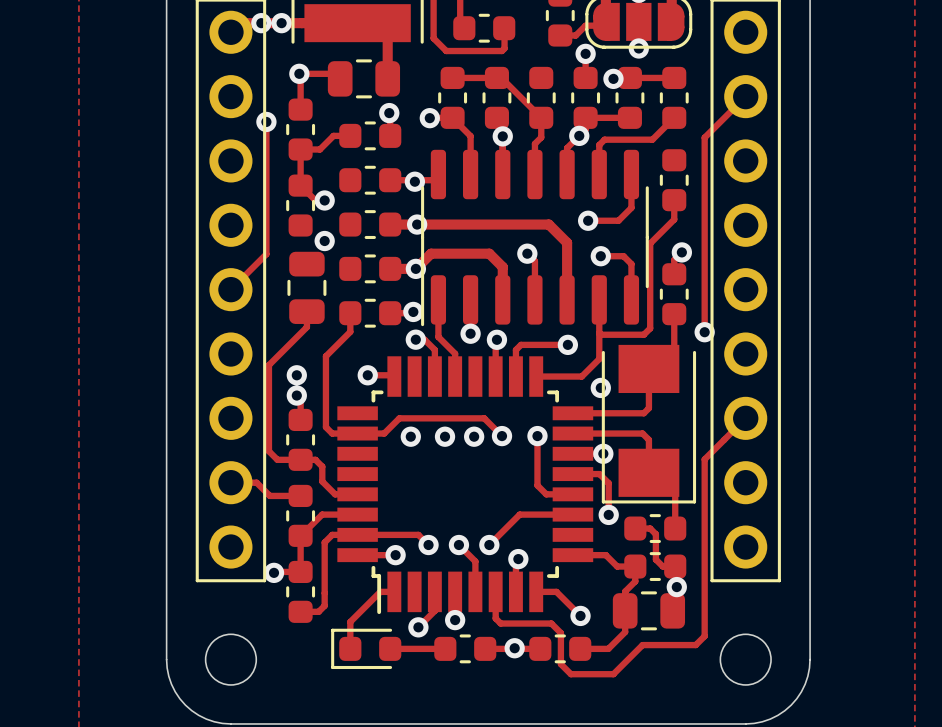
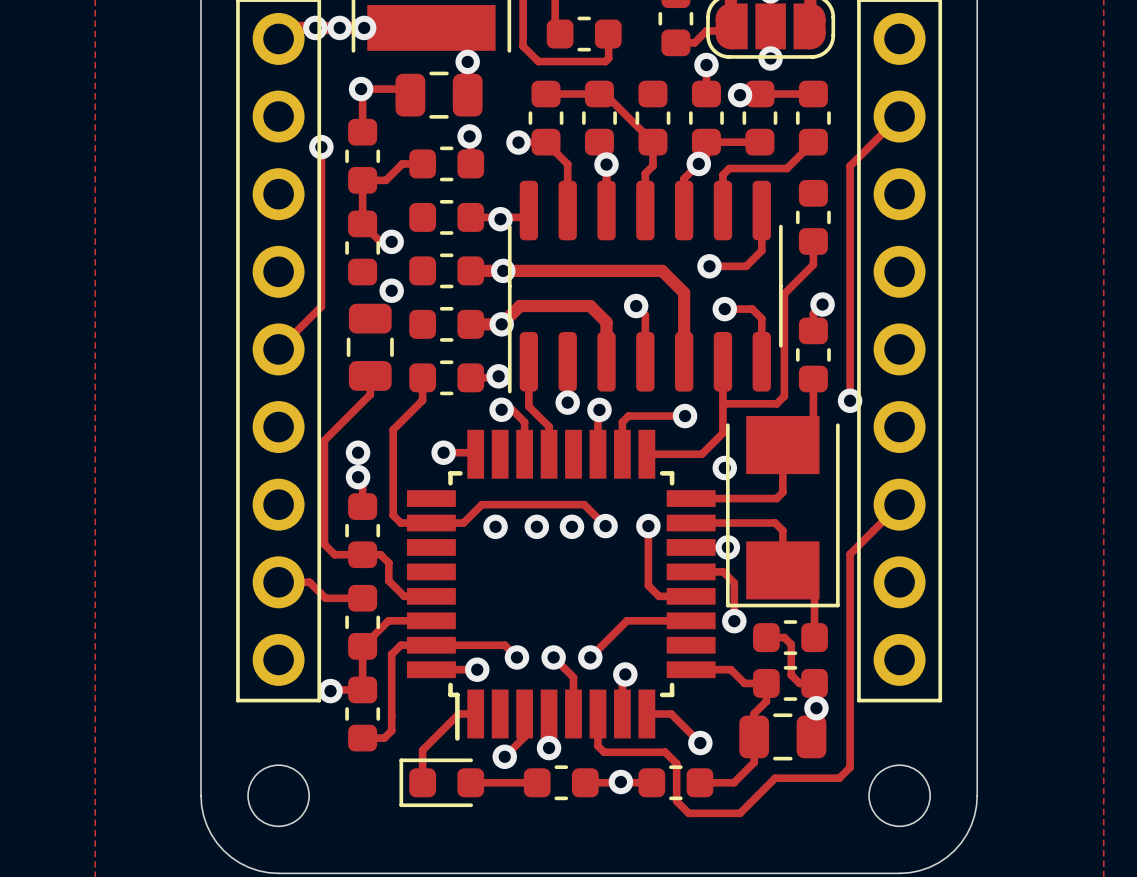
via: none -> (364, 27)
via: none -> (467, 61)

